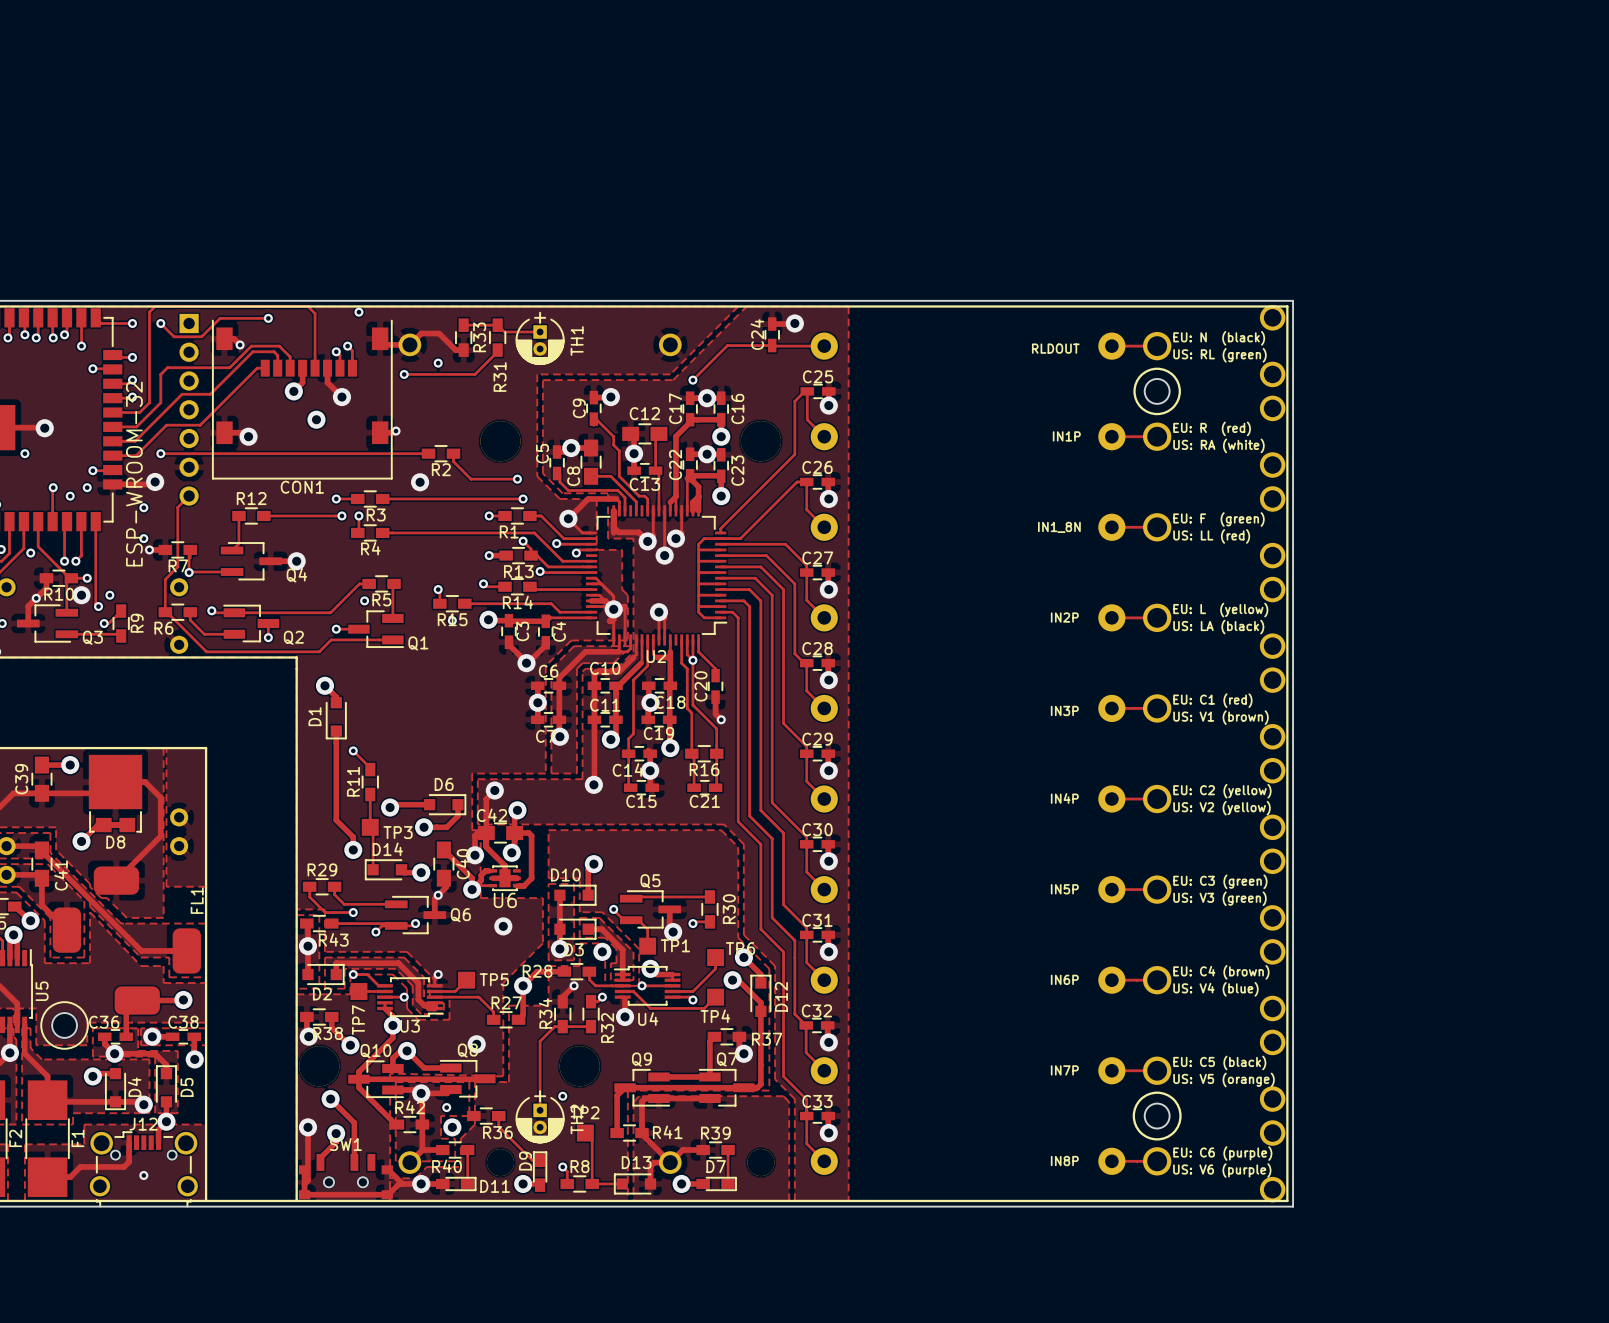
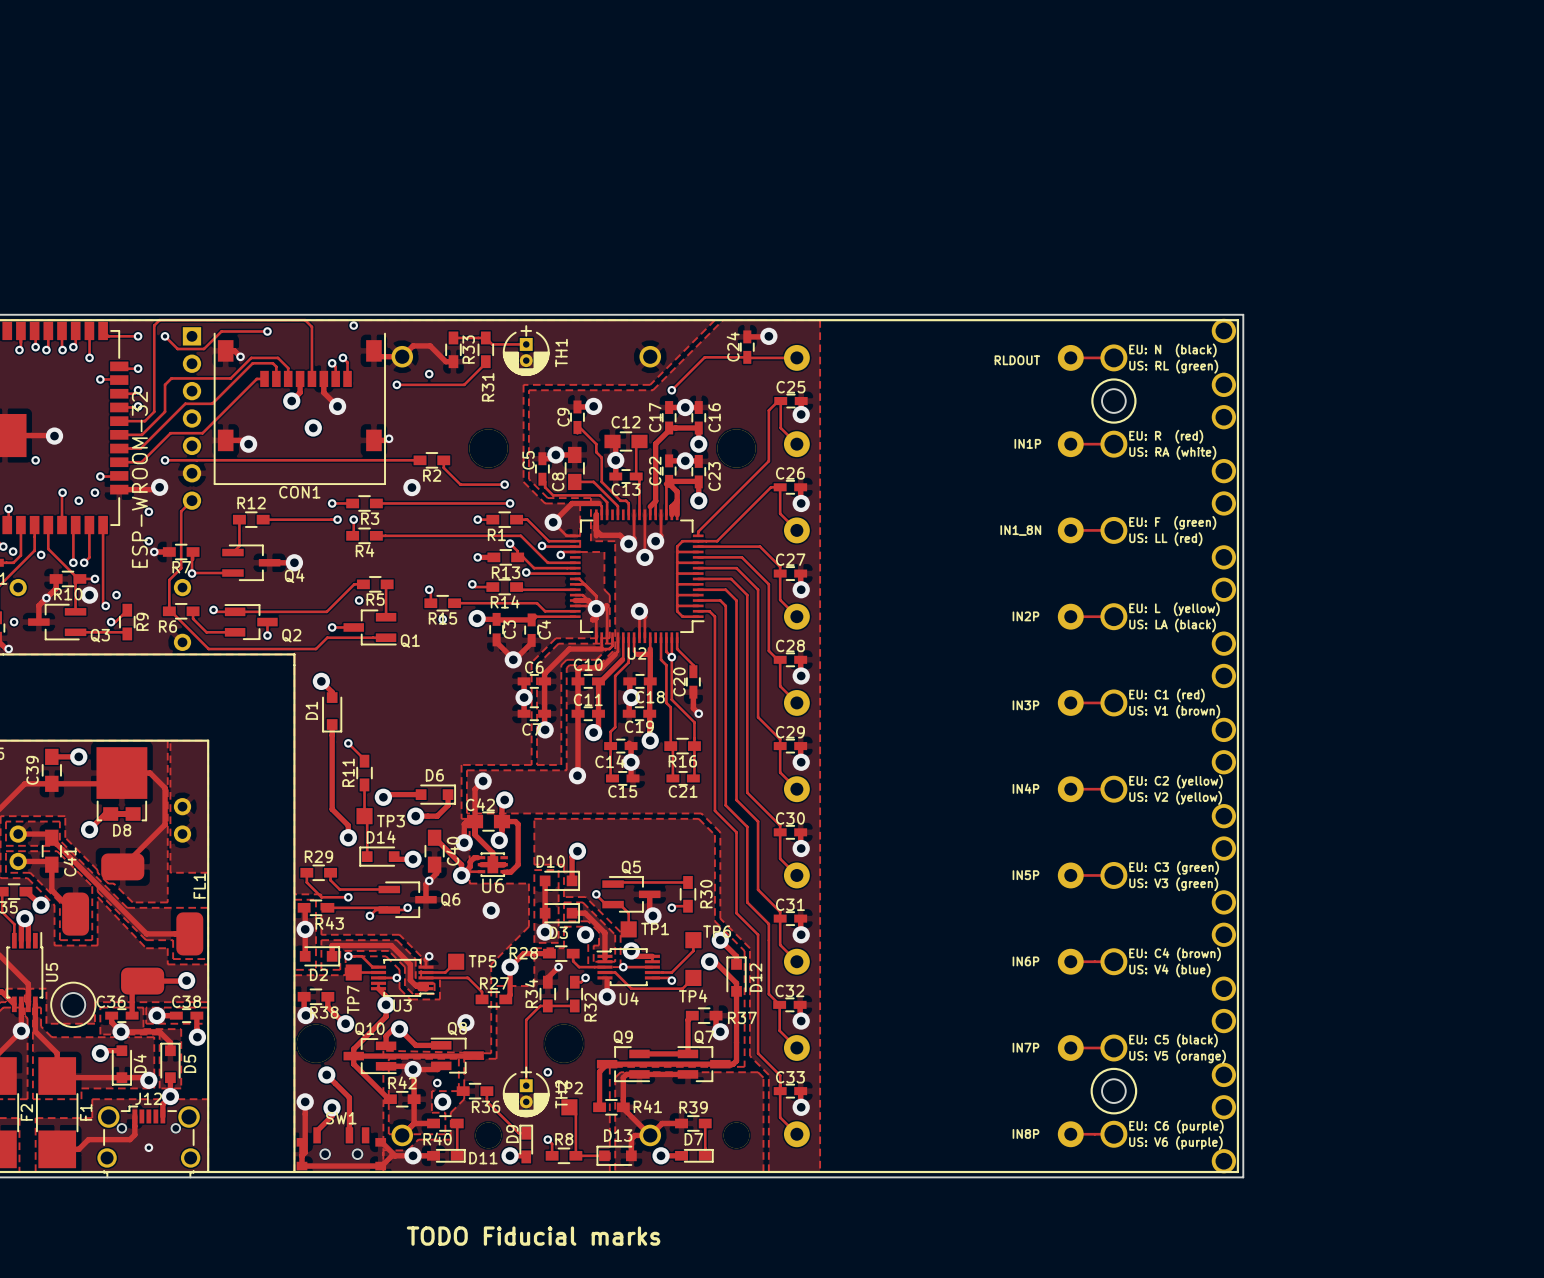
text: none -> TODO Fiducial marks (533, 1236)

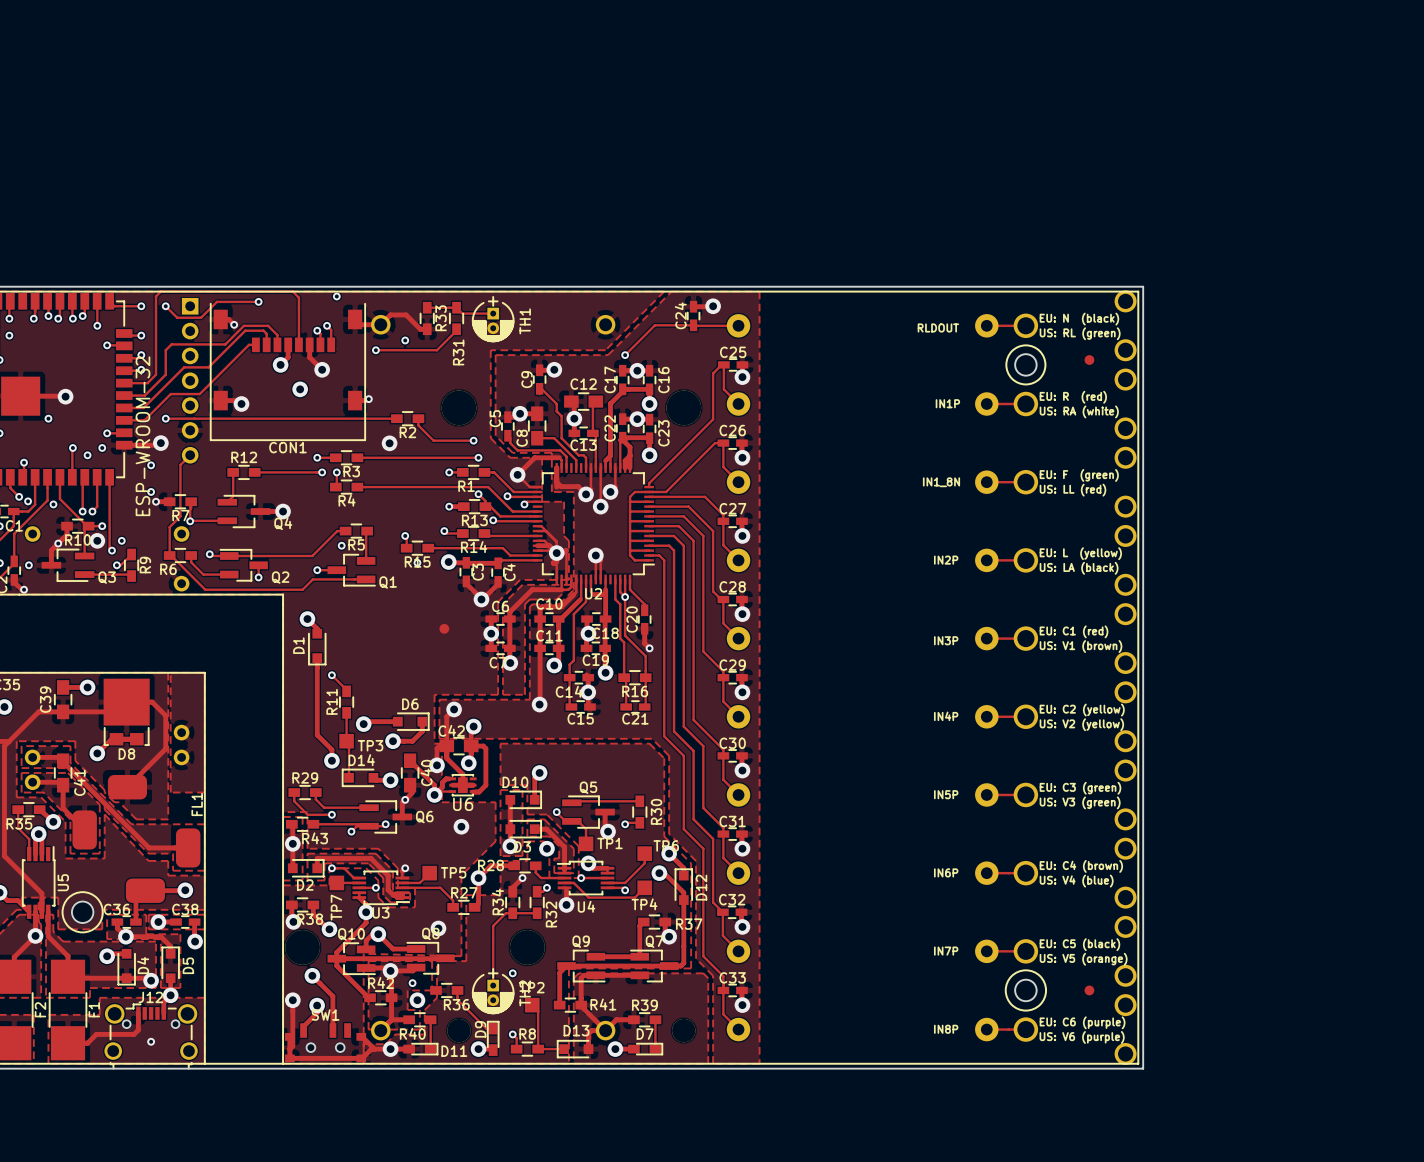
part: none -> (1089, 360)
part: none -> (444, 628)
part: none -> (1089, 990)
text: TODO Fiducial marks (533, 1236) -> none

